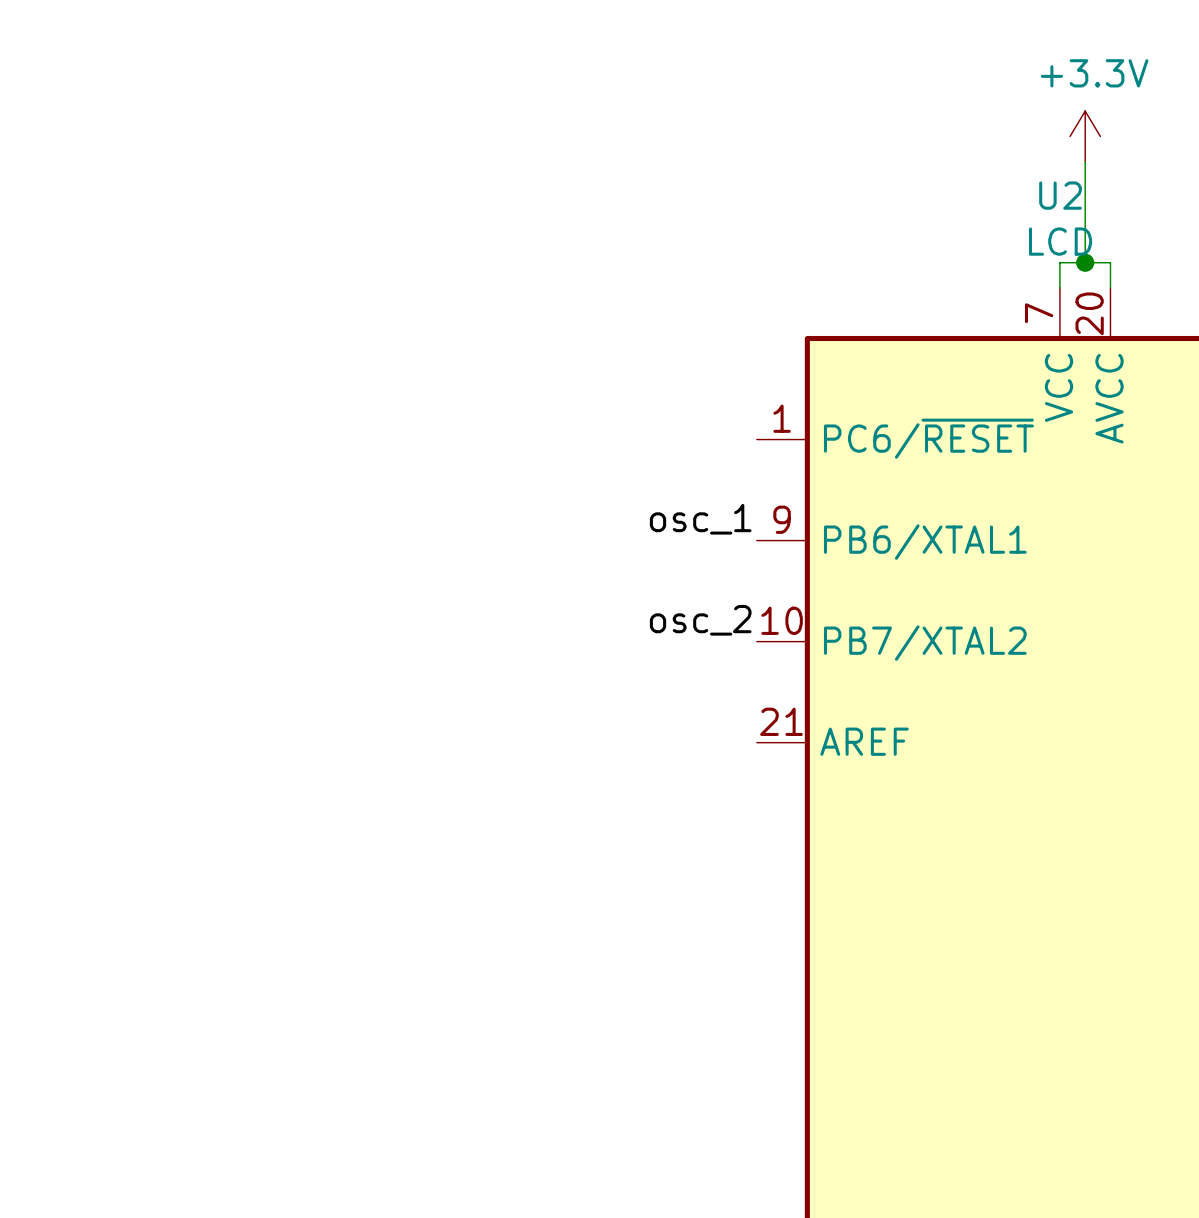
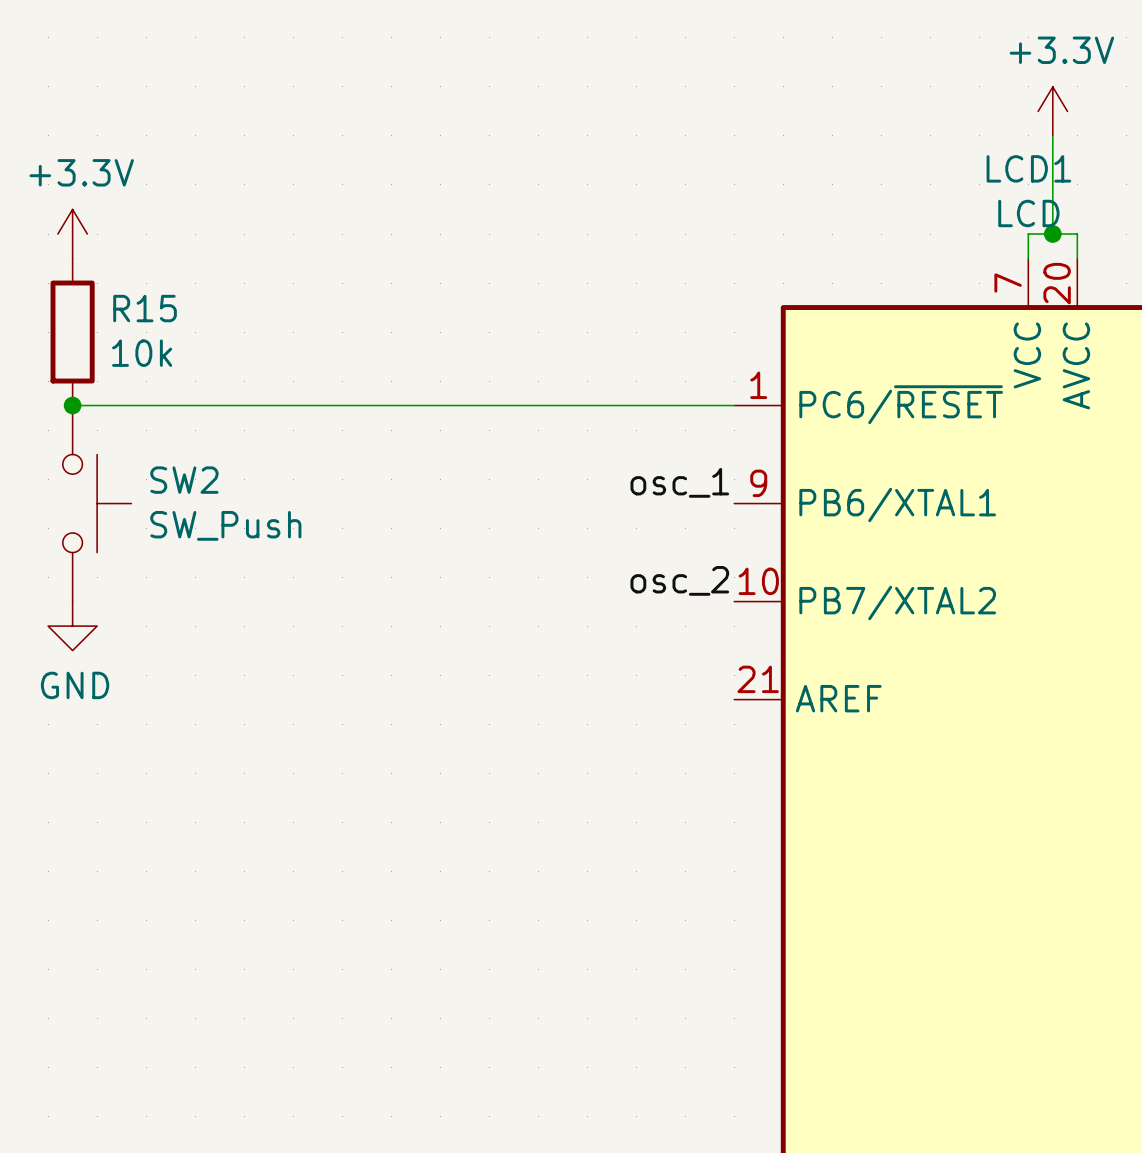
U2 name: U2 (1060, 195) -> LCD1 (1028, 168)
power symbol: none -> +3.3V (72, 234)
R15: none -> 10k (72, 332)
wire: none -> (72, 405) (734, 405)
junction: none -> (72, 405)
SW2: none -> SW_Push (97, 503)
power symbol: none -> GND (72, 626)

